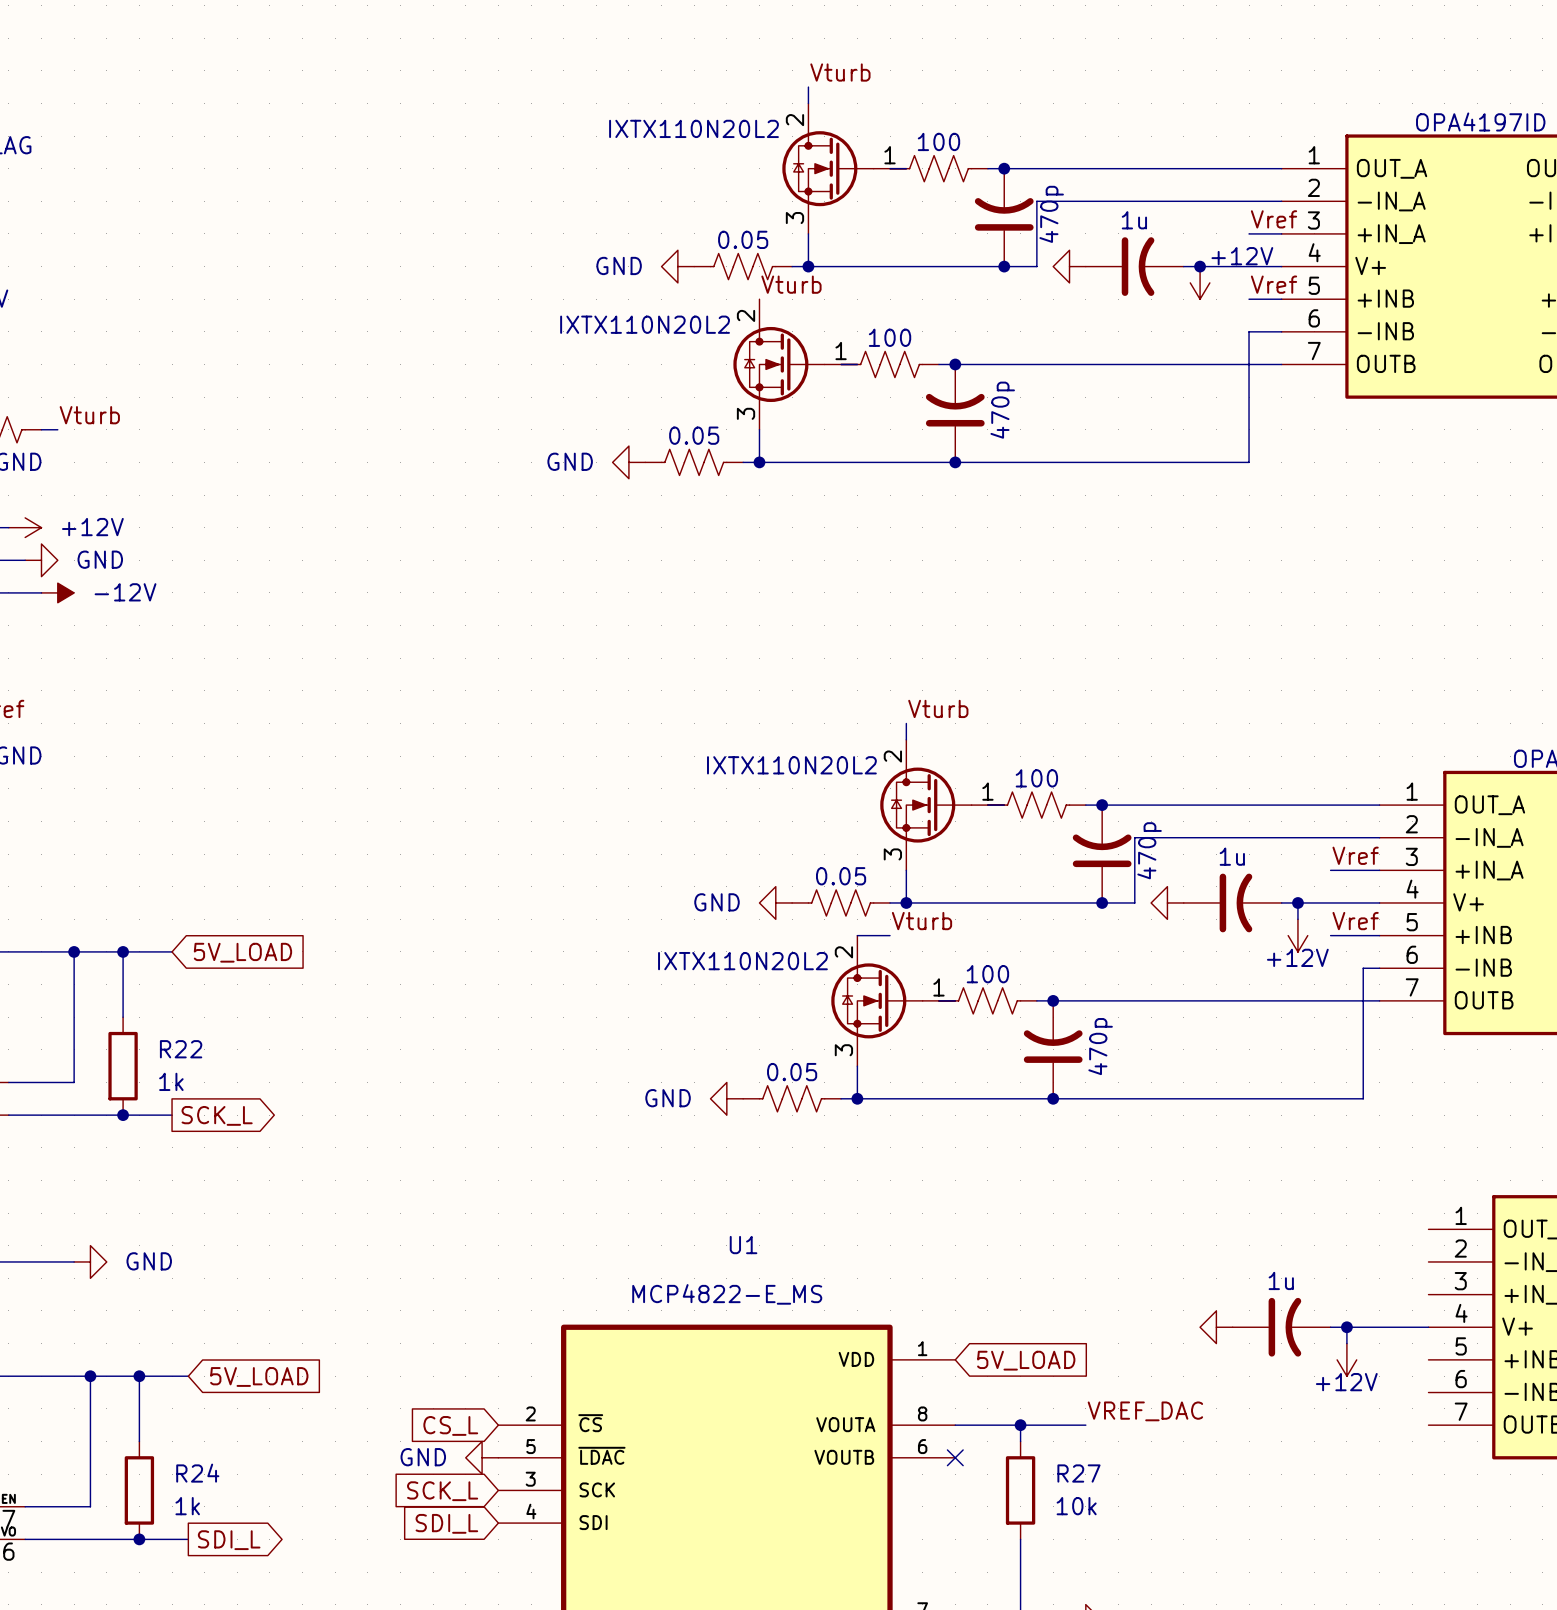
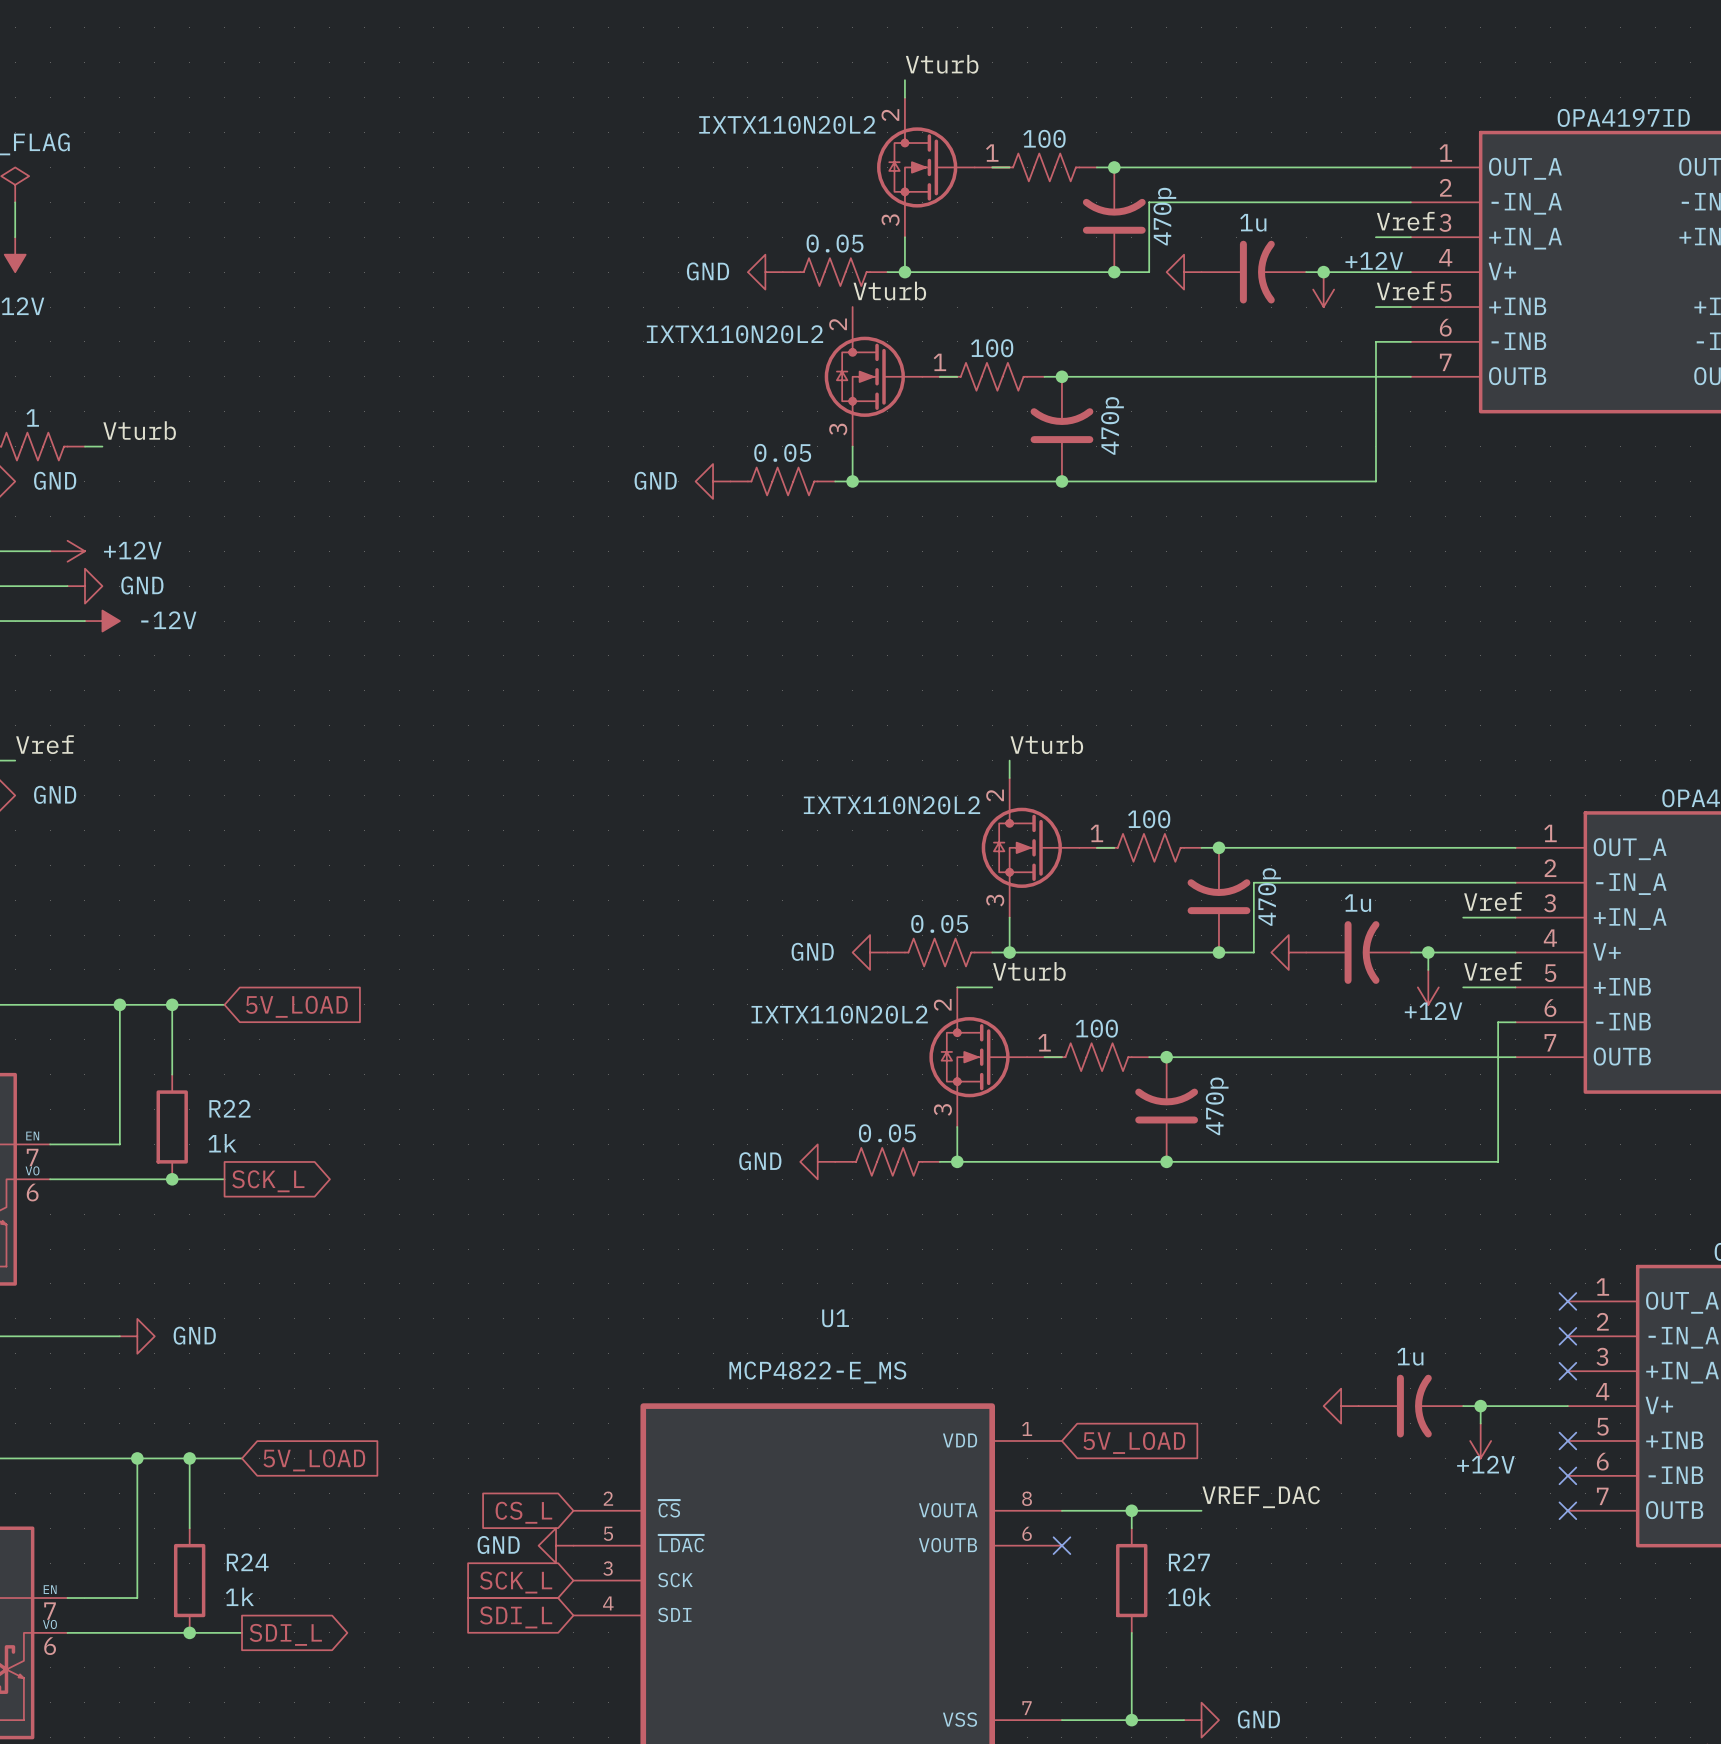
no-connect mark: none -> (1567, 1301)
no-connect mark: none -> (1567, 1336)
no-connect mark: none -> (1567, 1371)
no-connect mark: none -> (1567, 1440)
no-connect mark: none -> (1567, 1475)
no-connect mark: none -> (1567, 1510)

